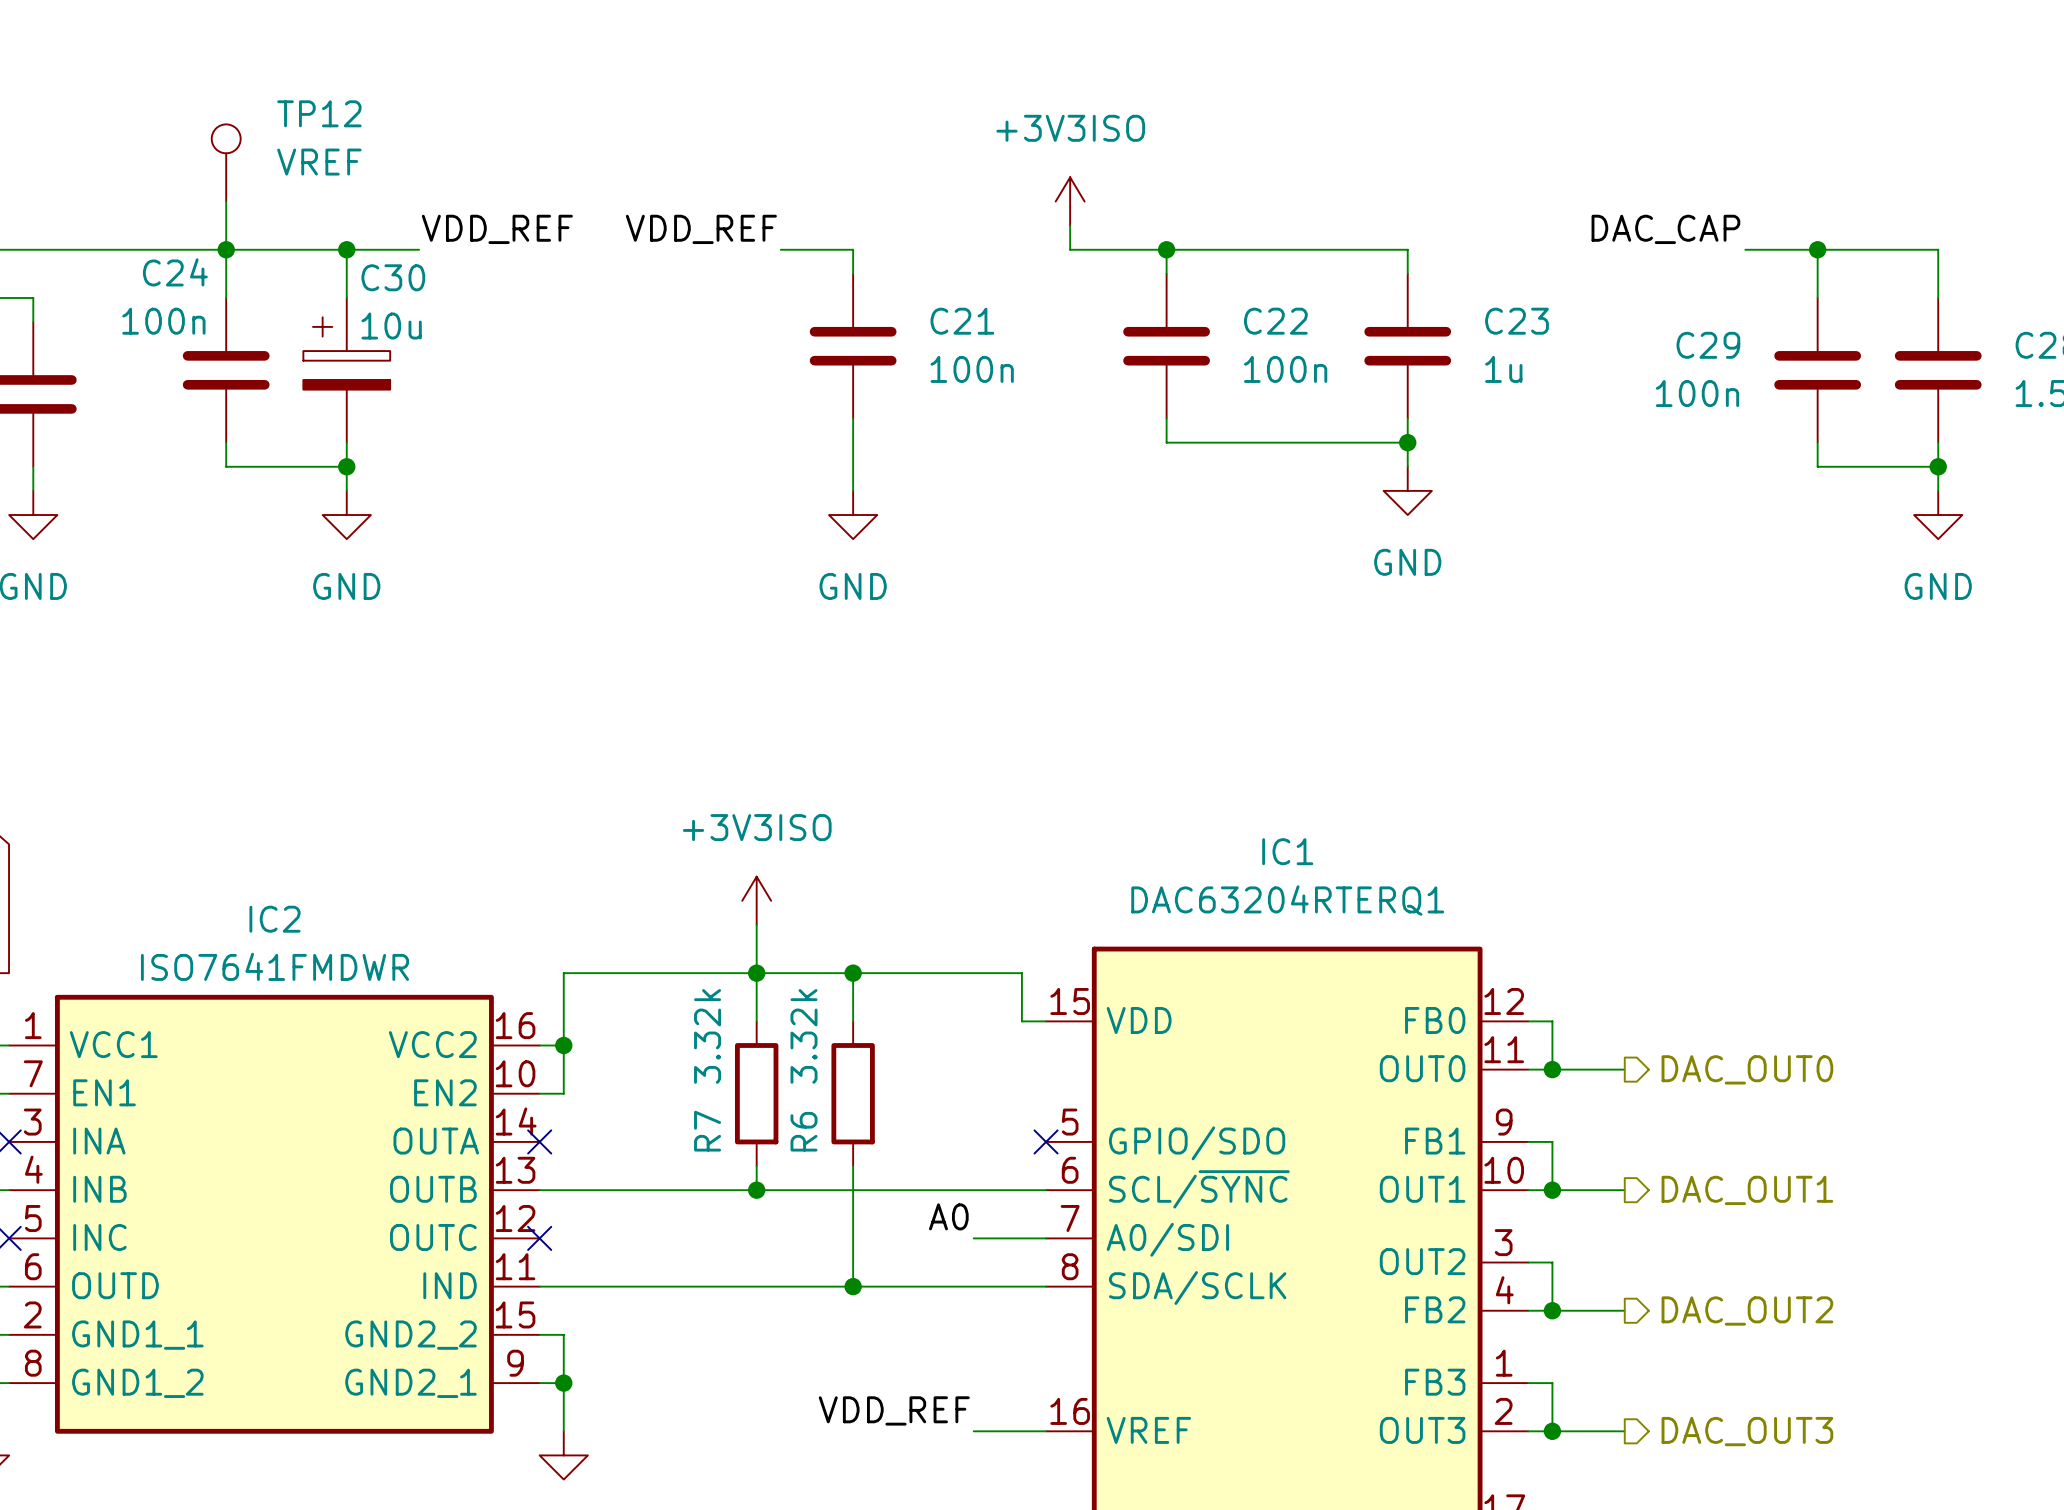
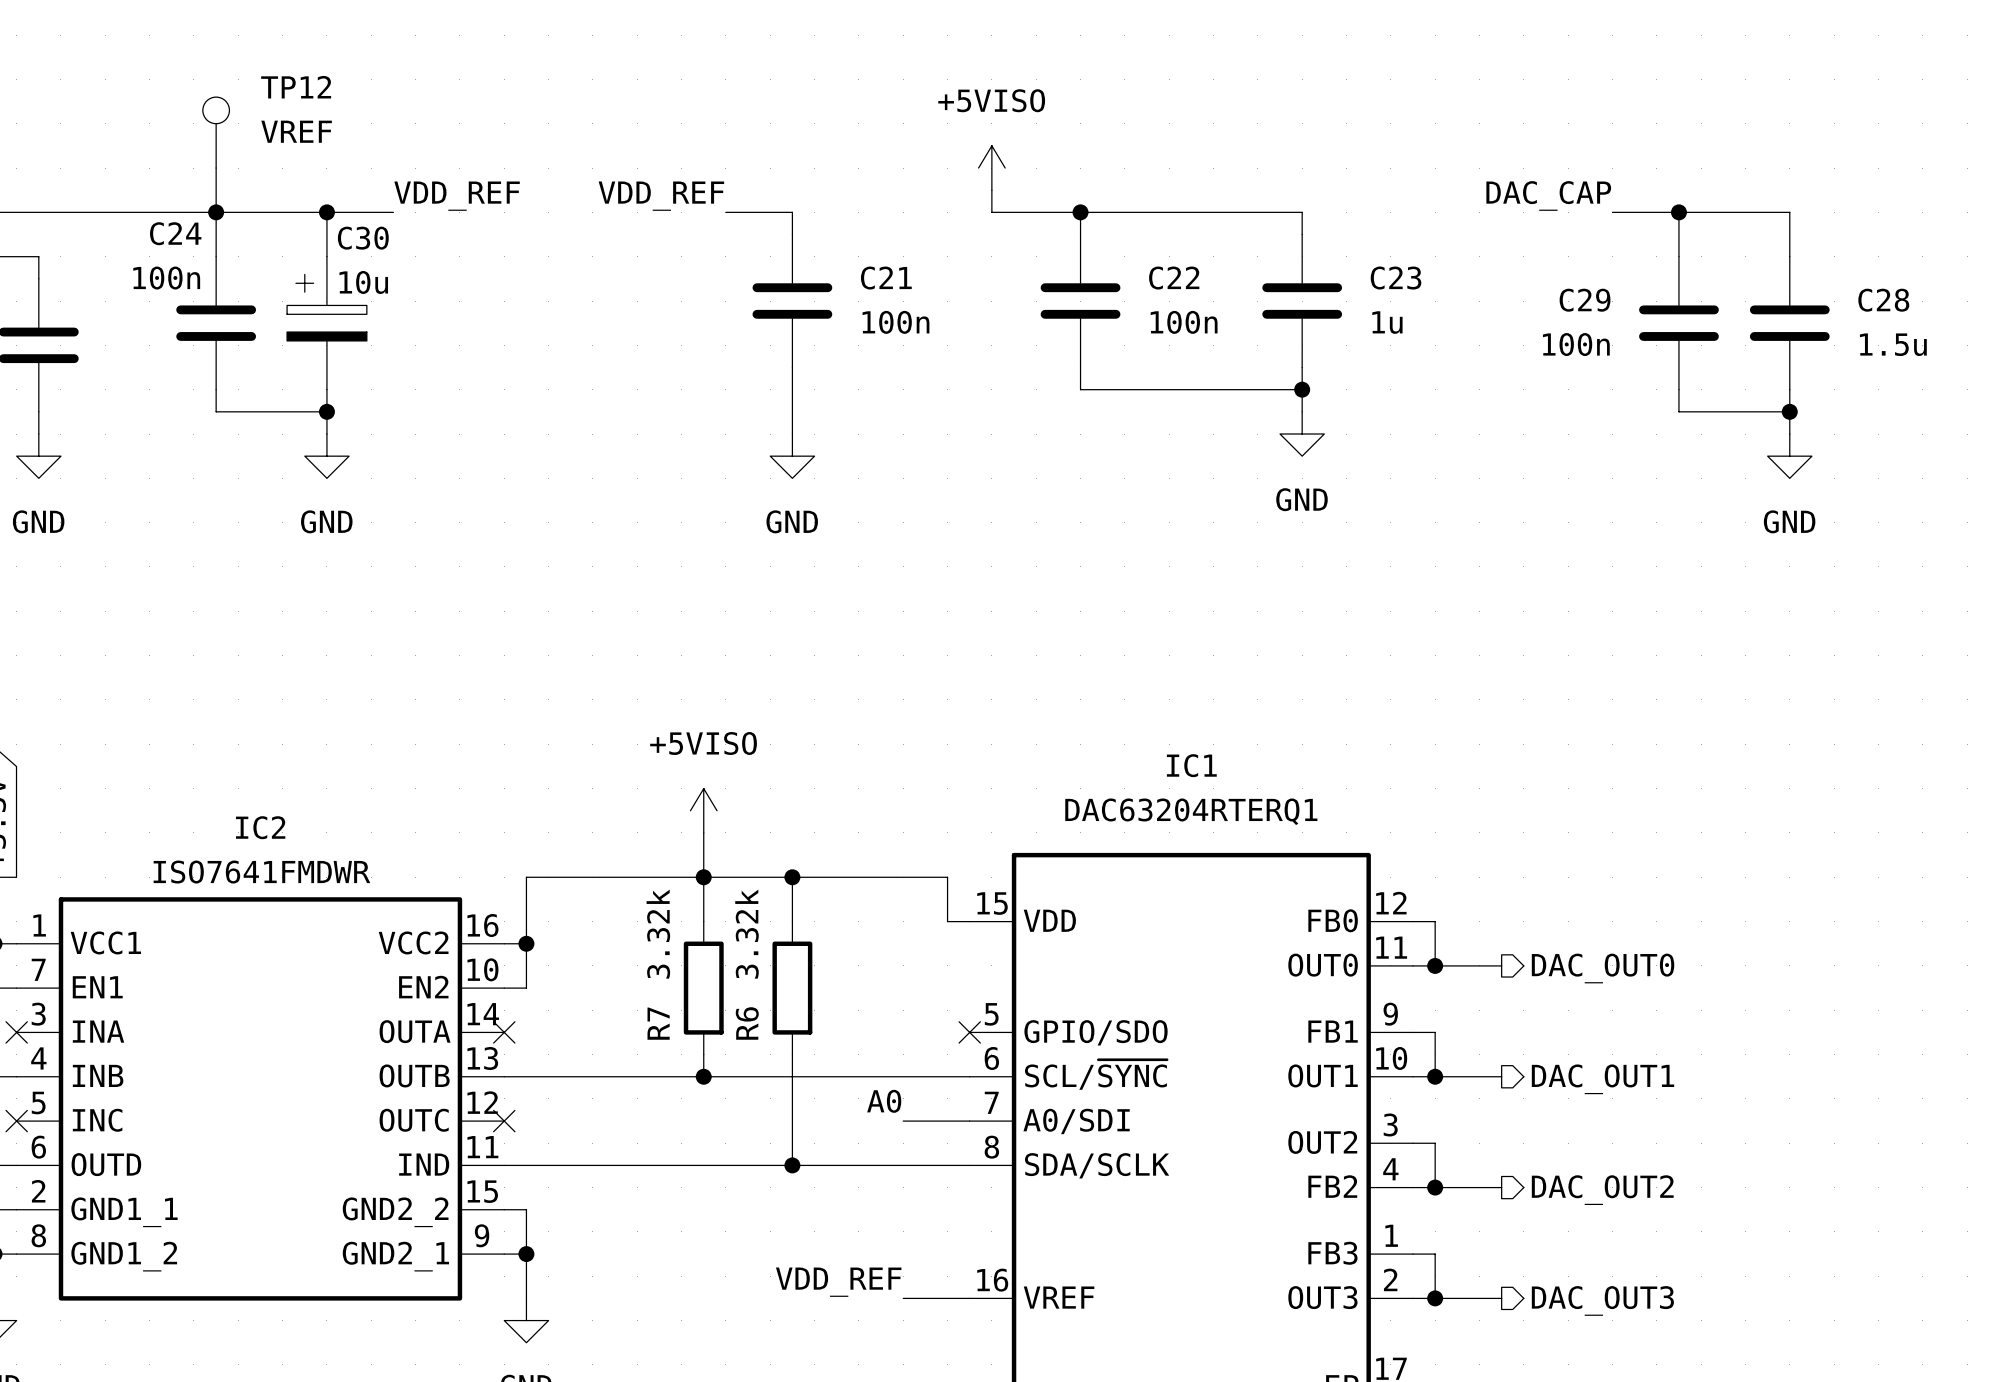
power symbol: +3V3ISO (1070, 201) -> +5VISO (991, 168)
power symbol: +3V3ISO (756, 900) -> +5VISO (703, 810)

